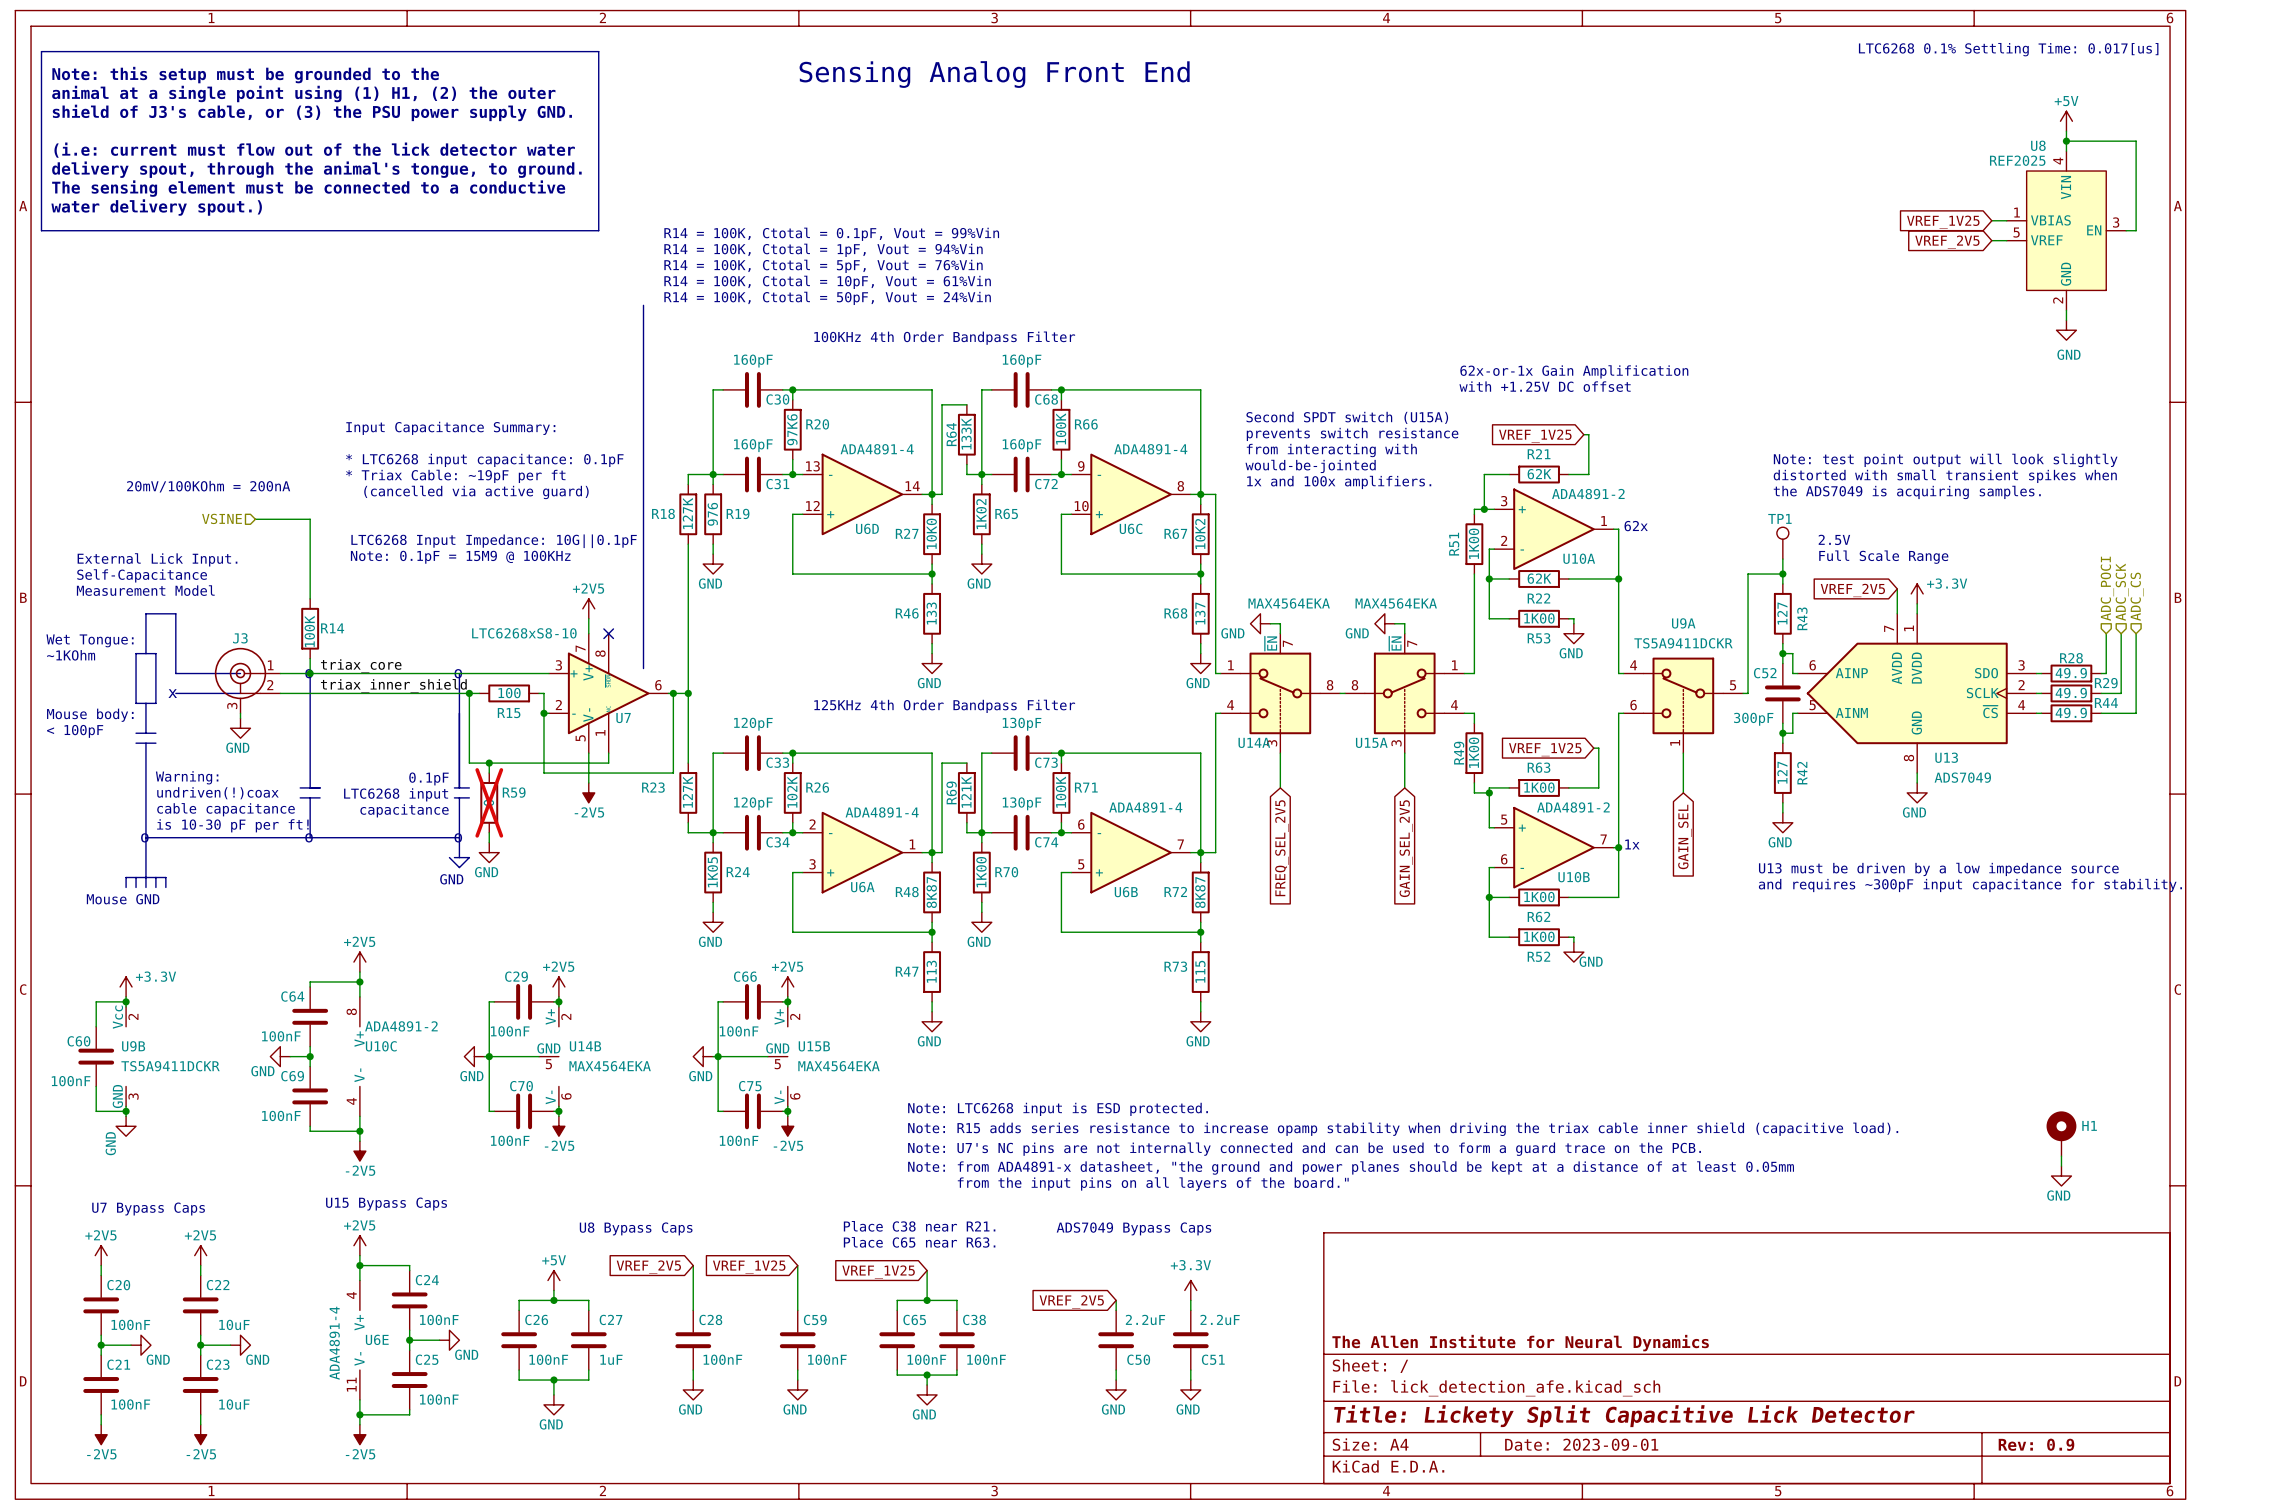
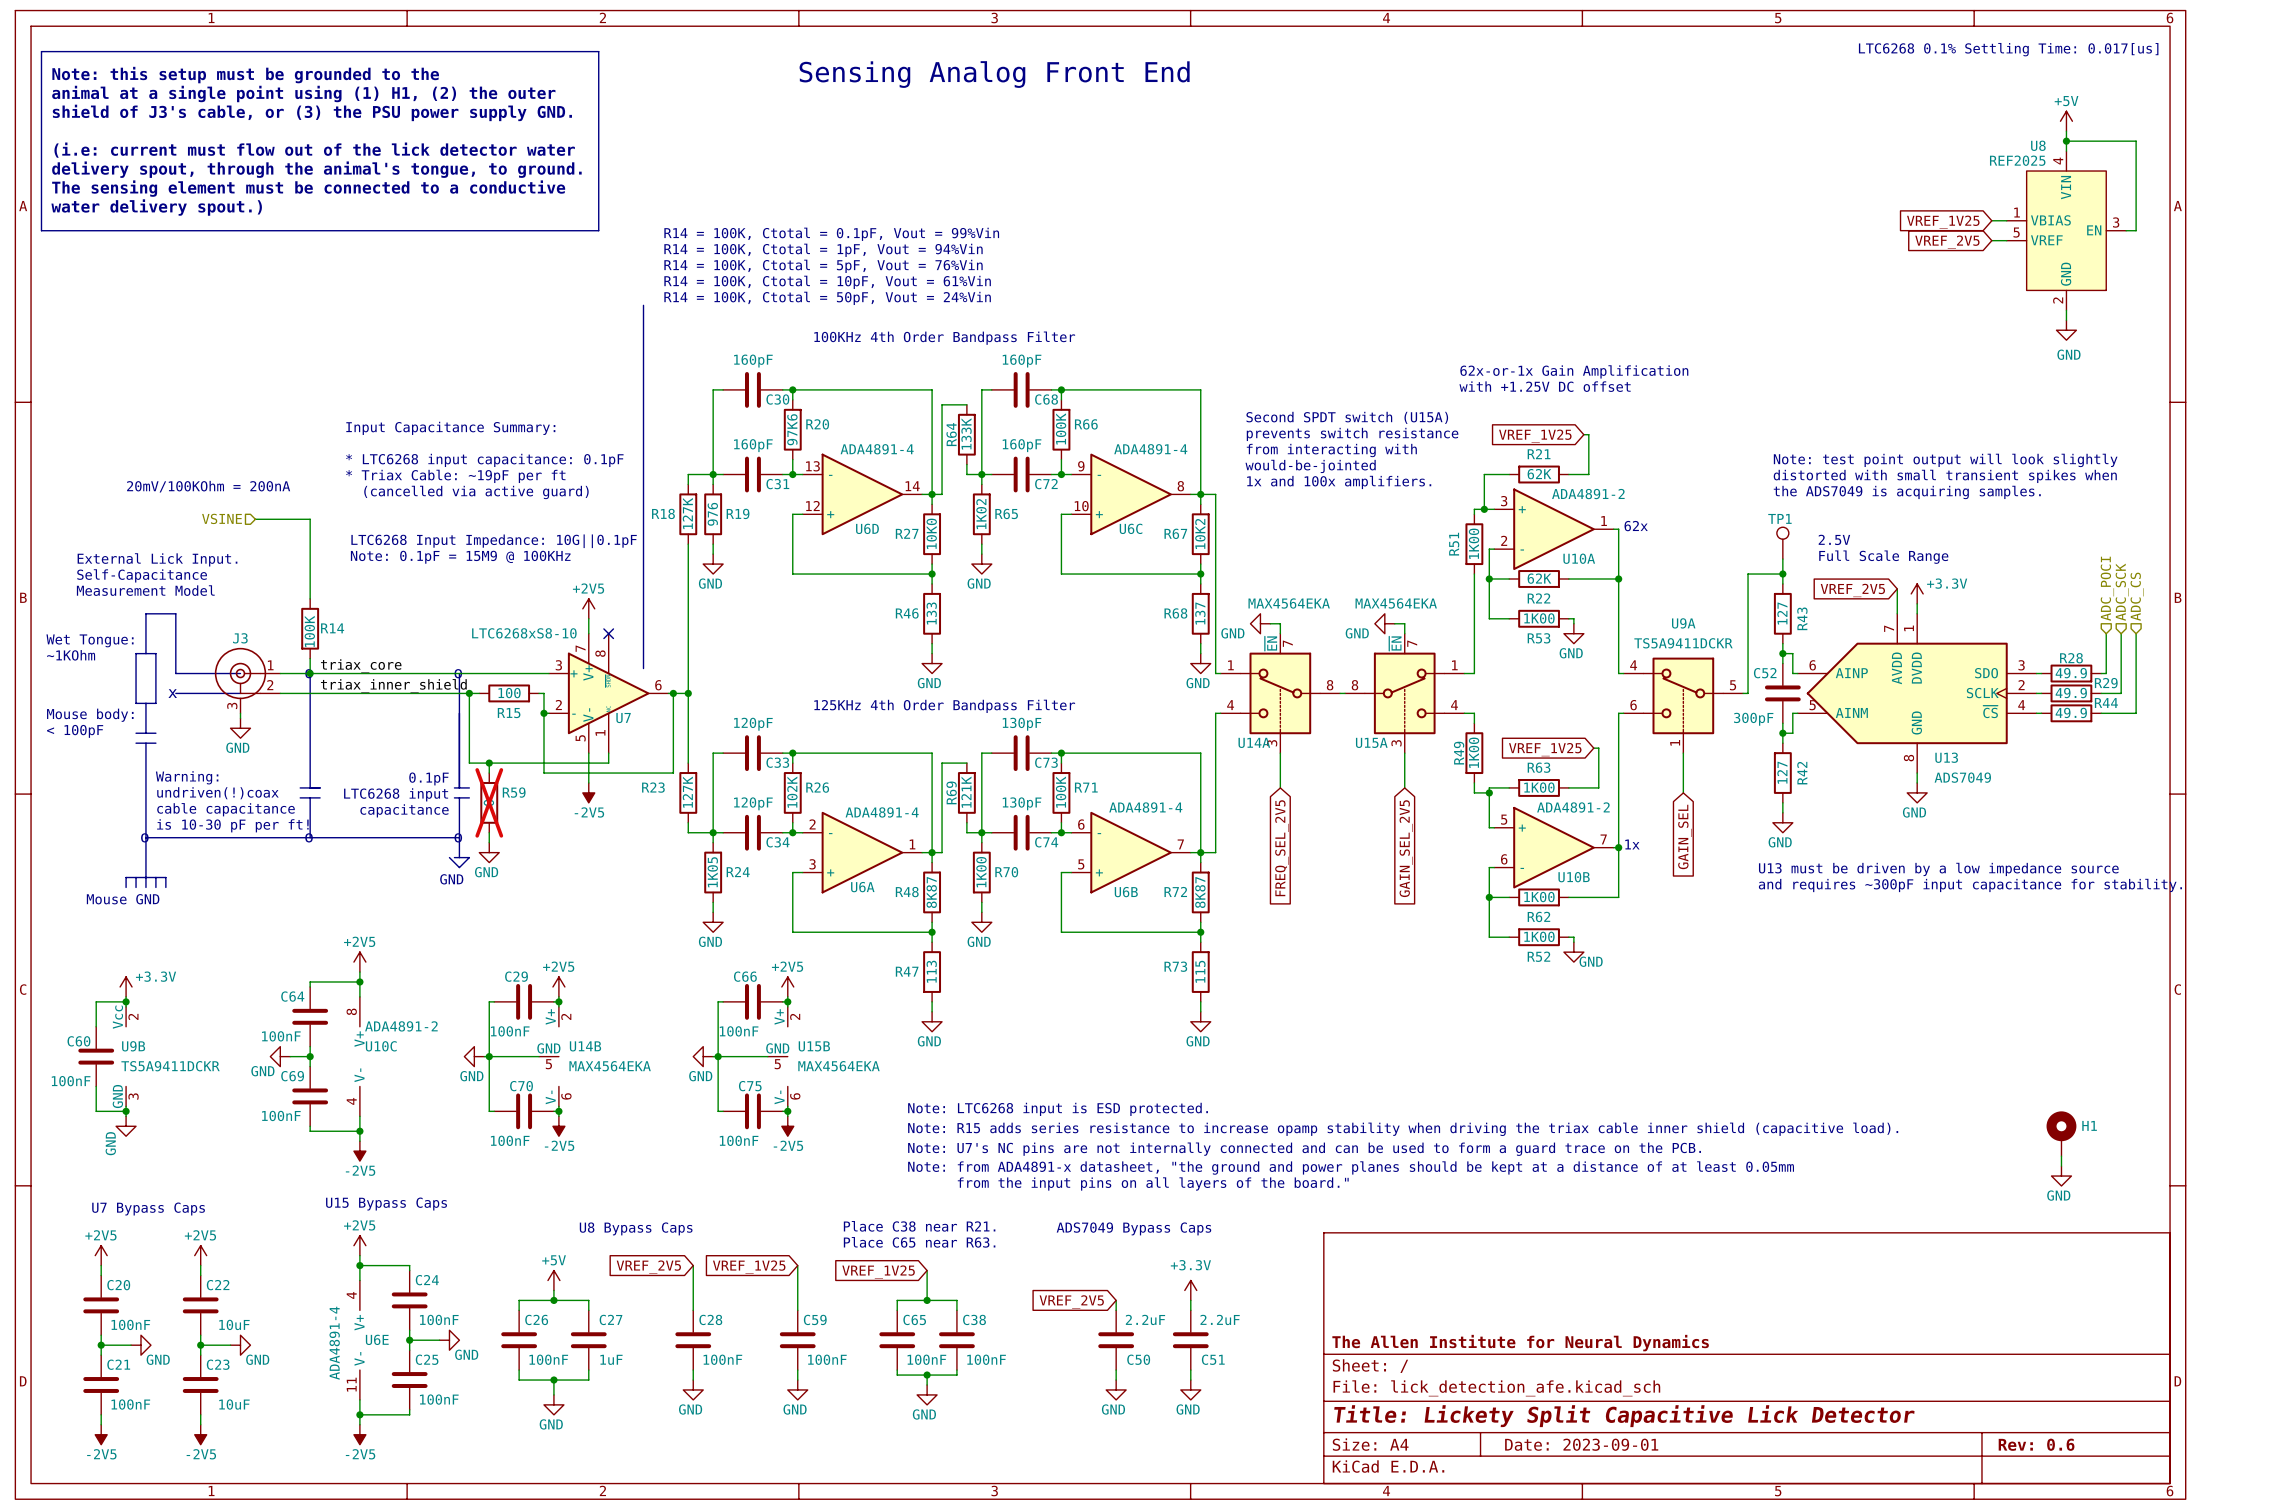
title block: Rev: 0.9 (2036, 1444) -> Rev: 0.6 (2036, 1444)

